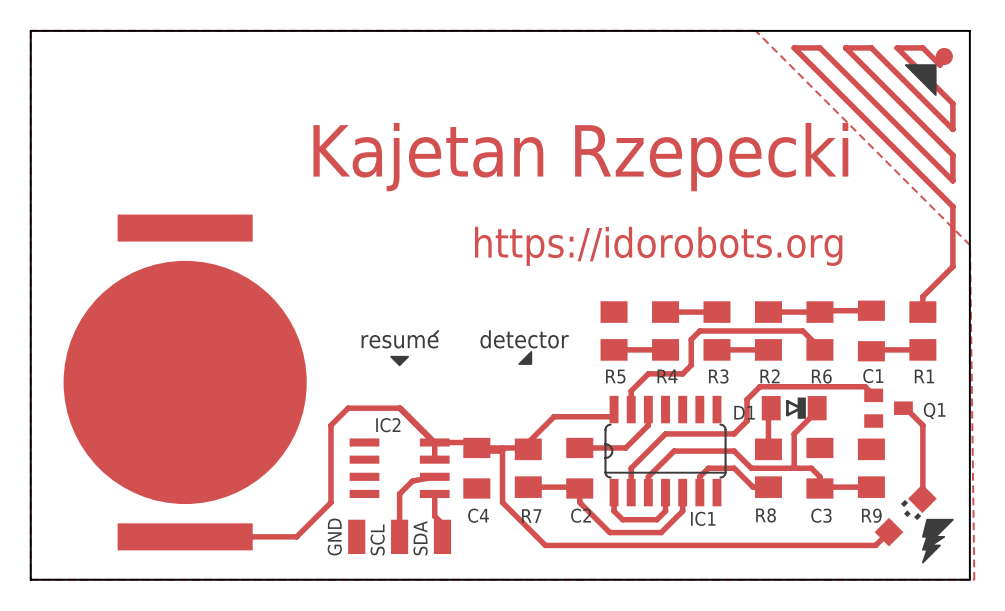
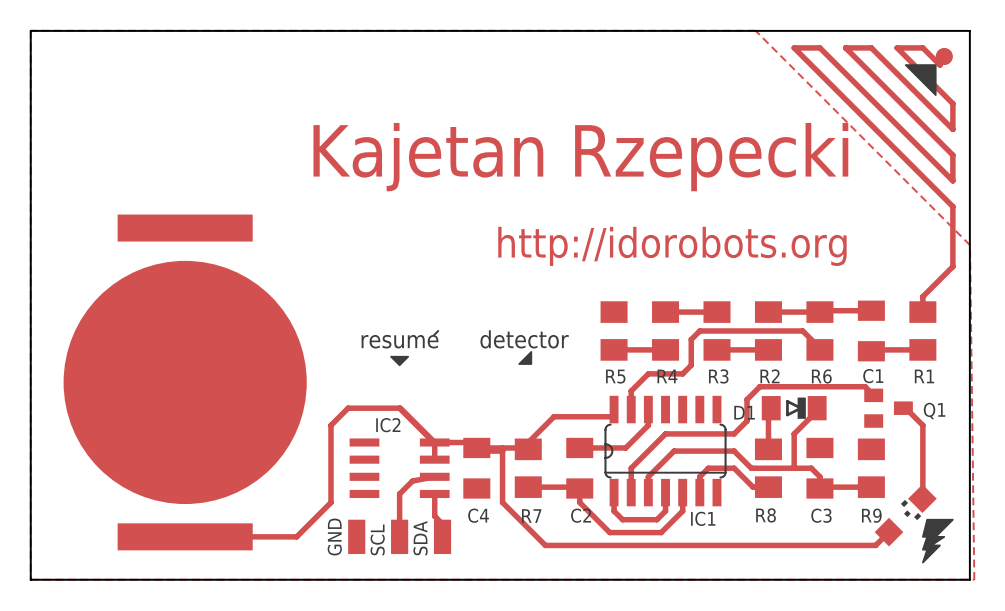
text: https://idorobots.org (658, 246) -> http://idorobots.org (672, 246)

